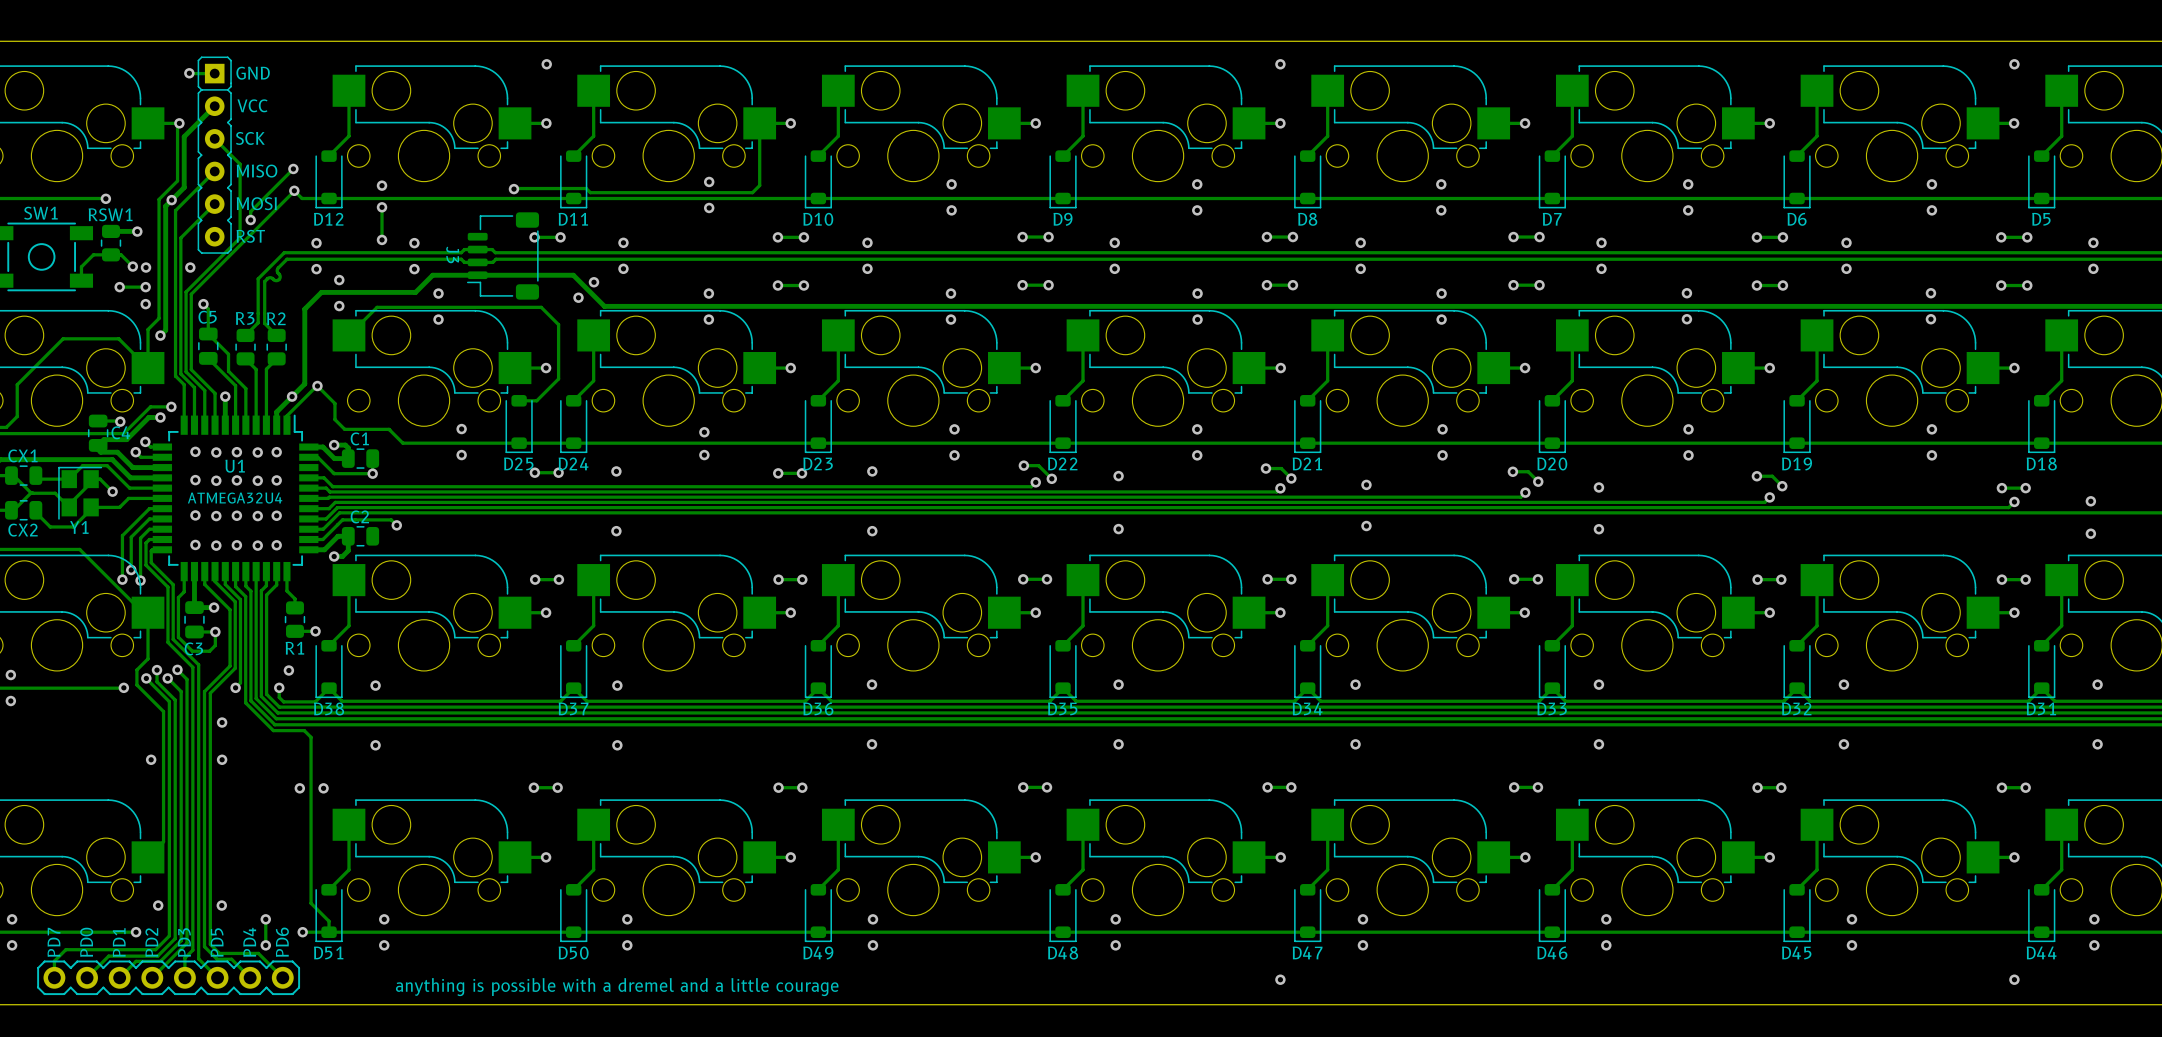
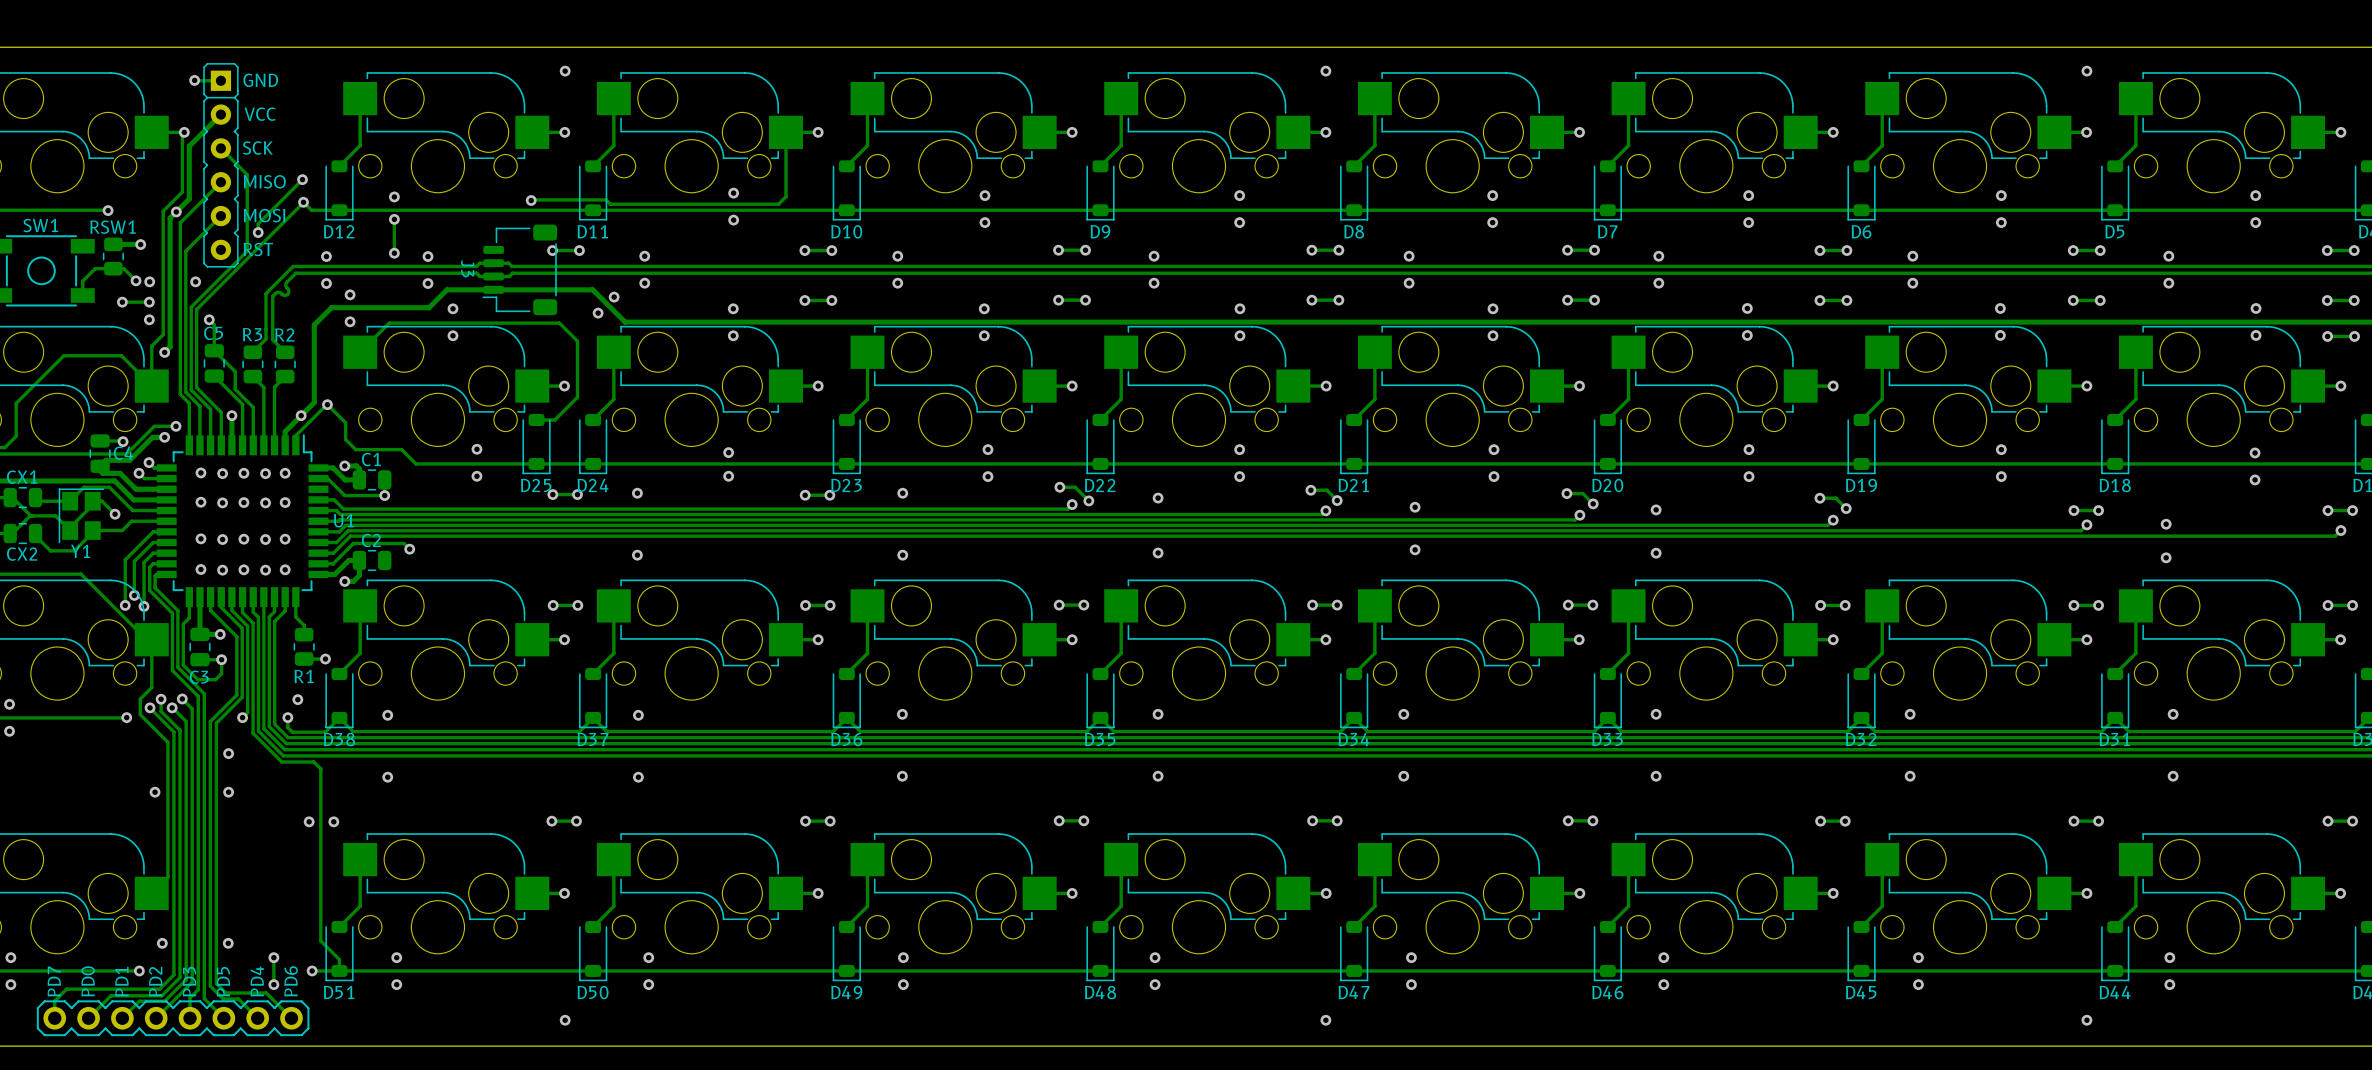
U1 name position: U1 (235, 466) -> U1 (344, 520)
U1 text: ATMEGA32U4 (235, 498) -> none
via: none -> (565, 1020)
text: anything is possible with a dremel and a little courage (617, 987) -> none

